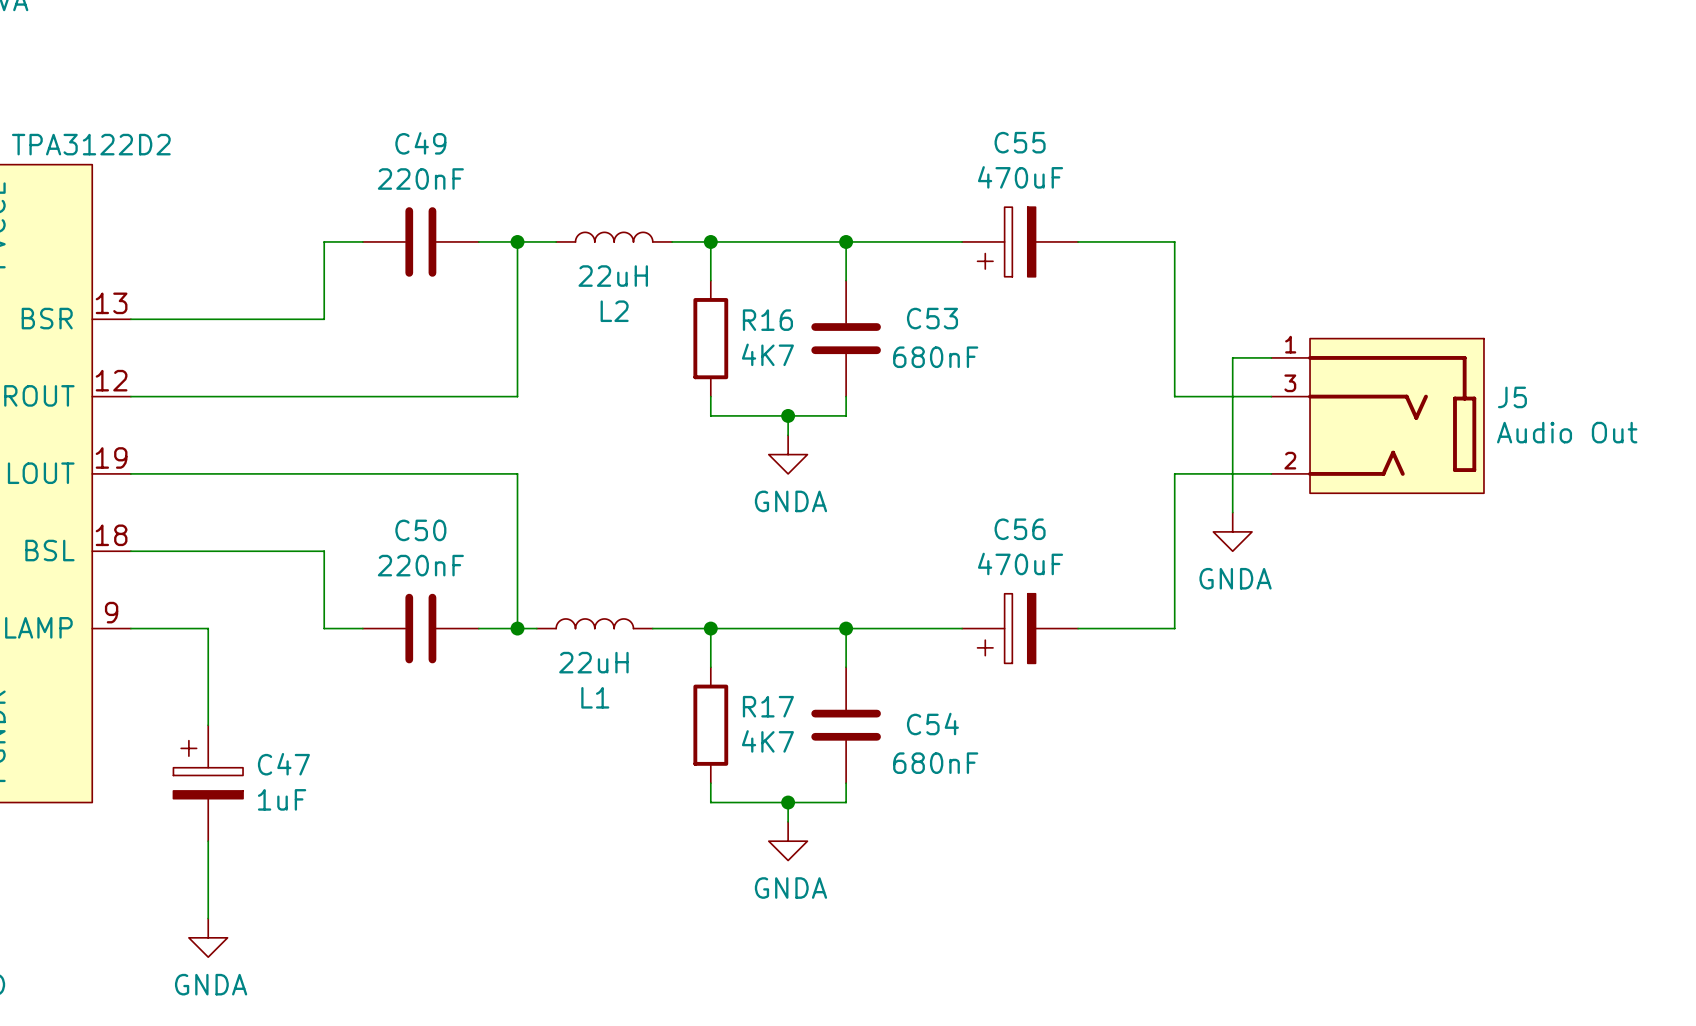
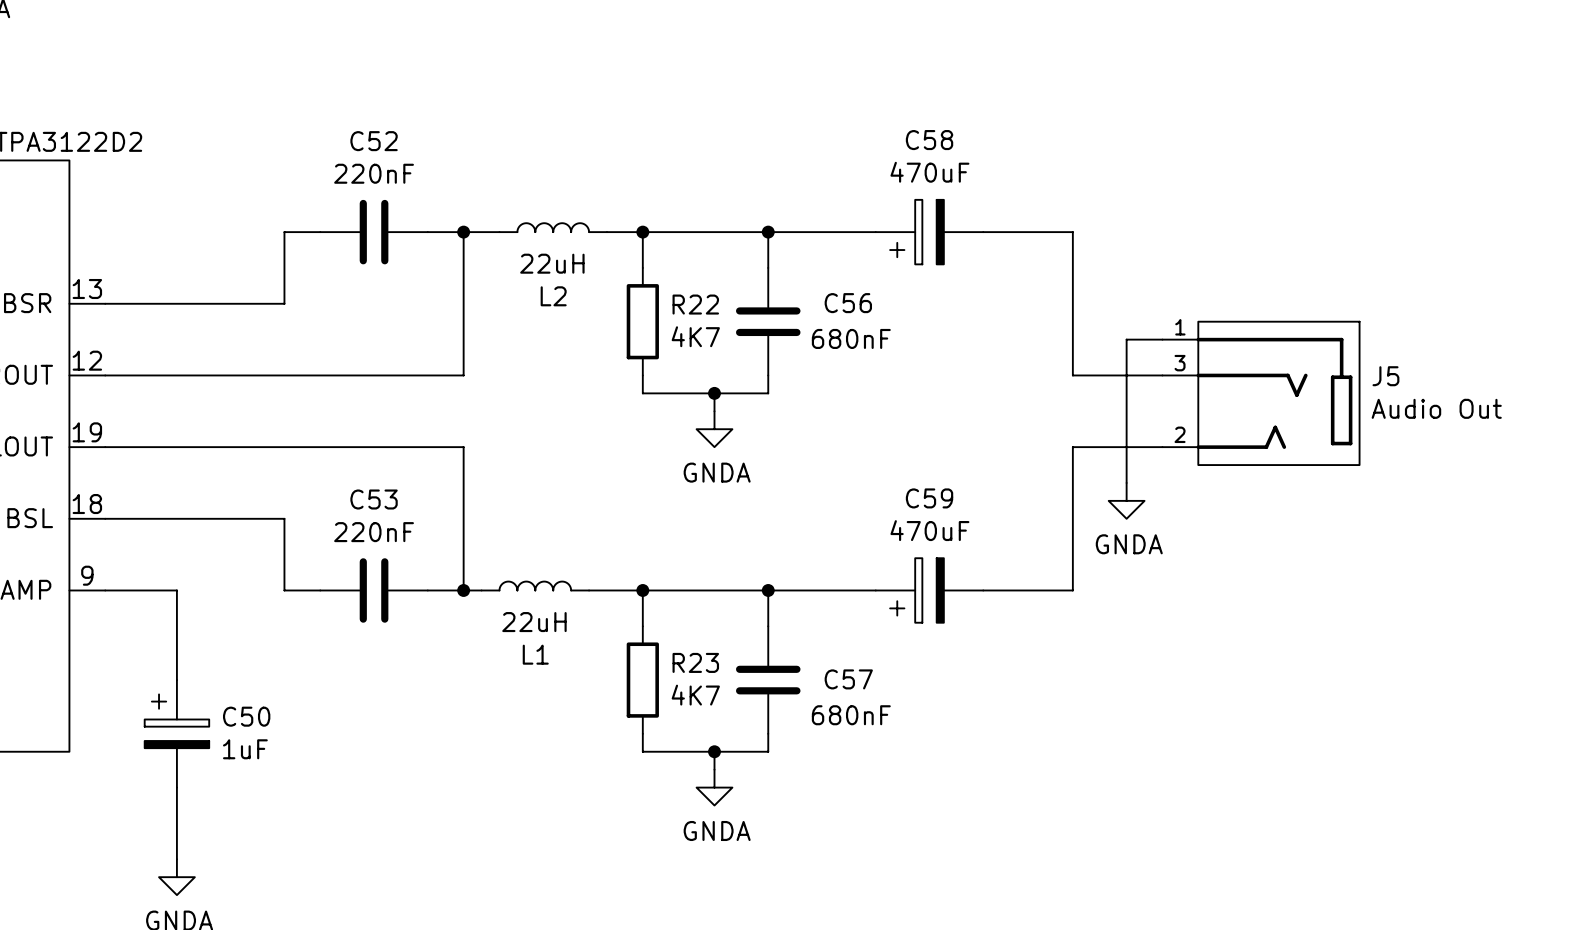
C55 name: C55 (1020, 142) -> C58 (929, 140)
C49 name: C49 (420, 143) -> C52 (374, 141)
C53 name: C53 (932, 318) -> C56 (848, 303)
R16 name: R16 (767, 320) -> R22 (695, 304)
C56 name: C56 (1020, 529) -> C59 (929, 498)
C50 name: C50 (420, 530) -> C53 (374, 499)
R17 name: R17 (768, 706) -> R23 (695, 662)
C54 name: C54 (932, 724) -> C57 (848, 679)
C47 name: C47 (283, 764) -> C50 (246, 716)

